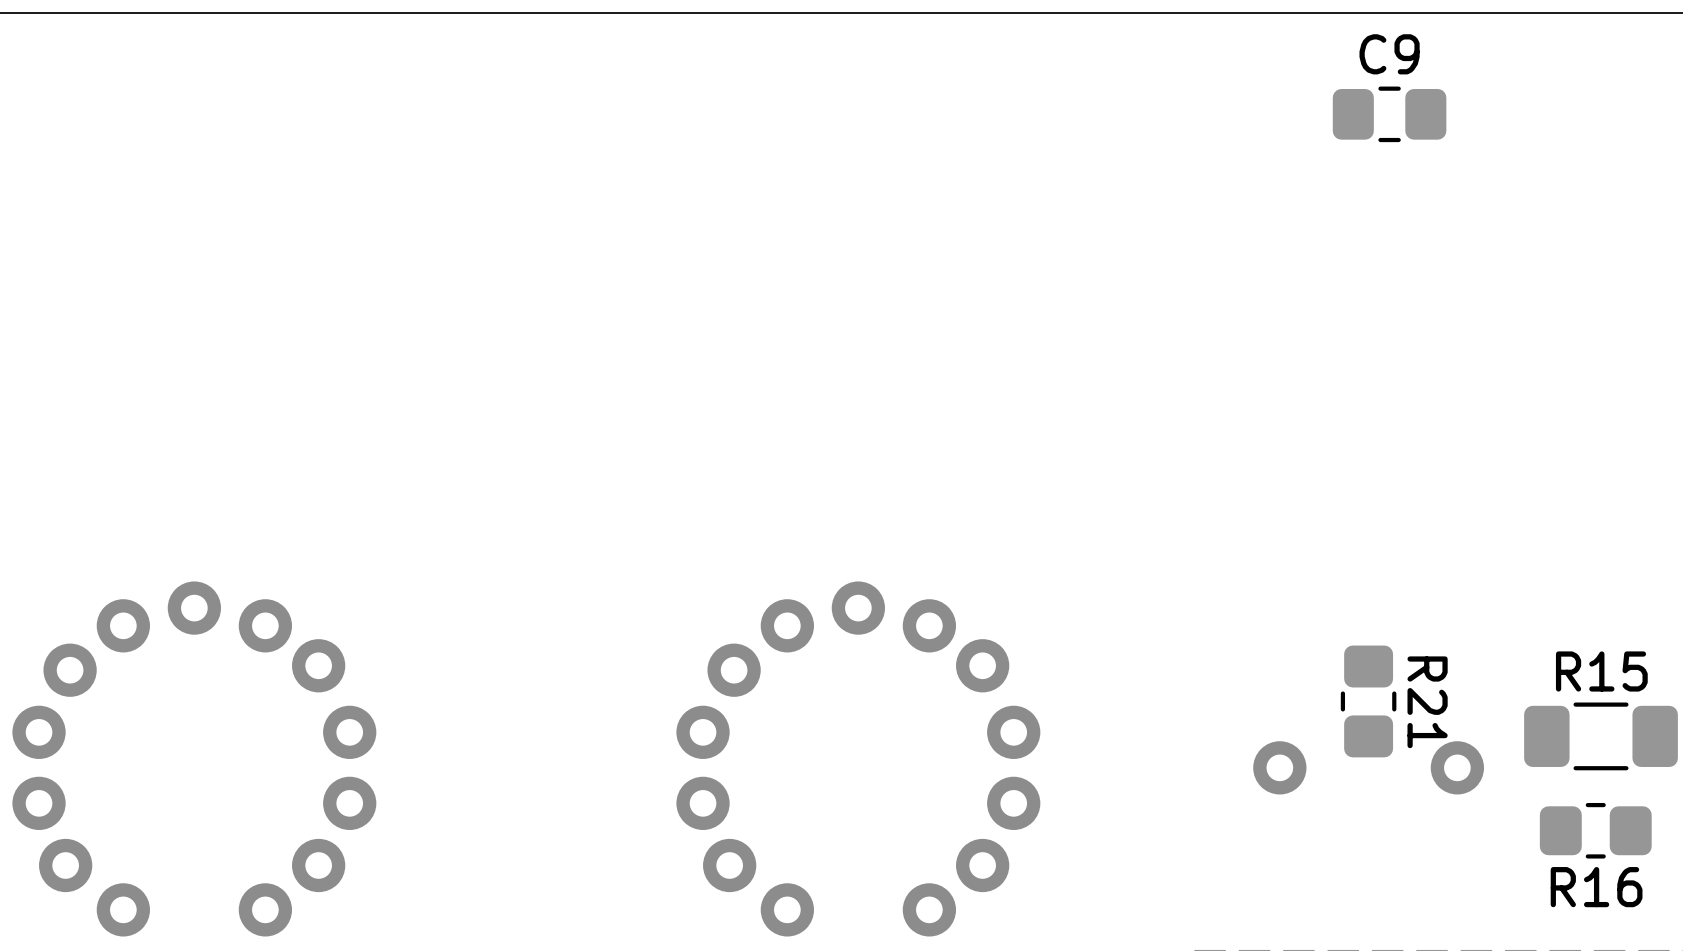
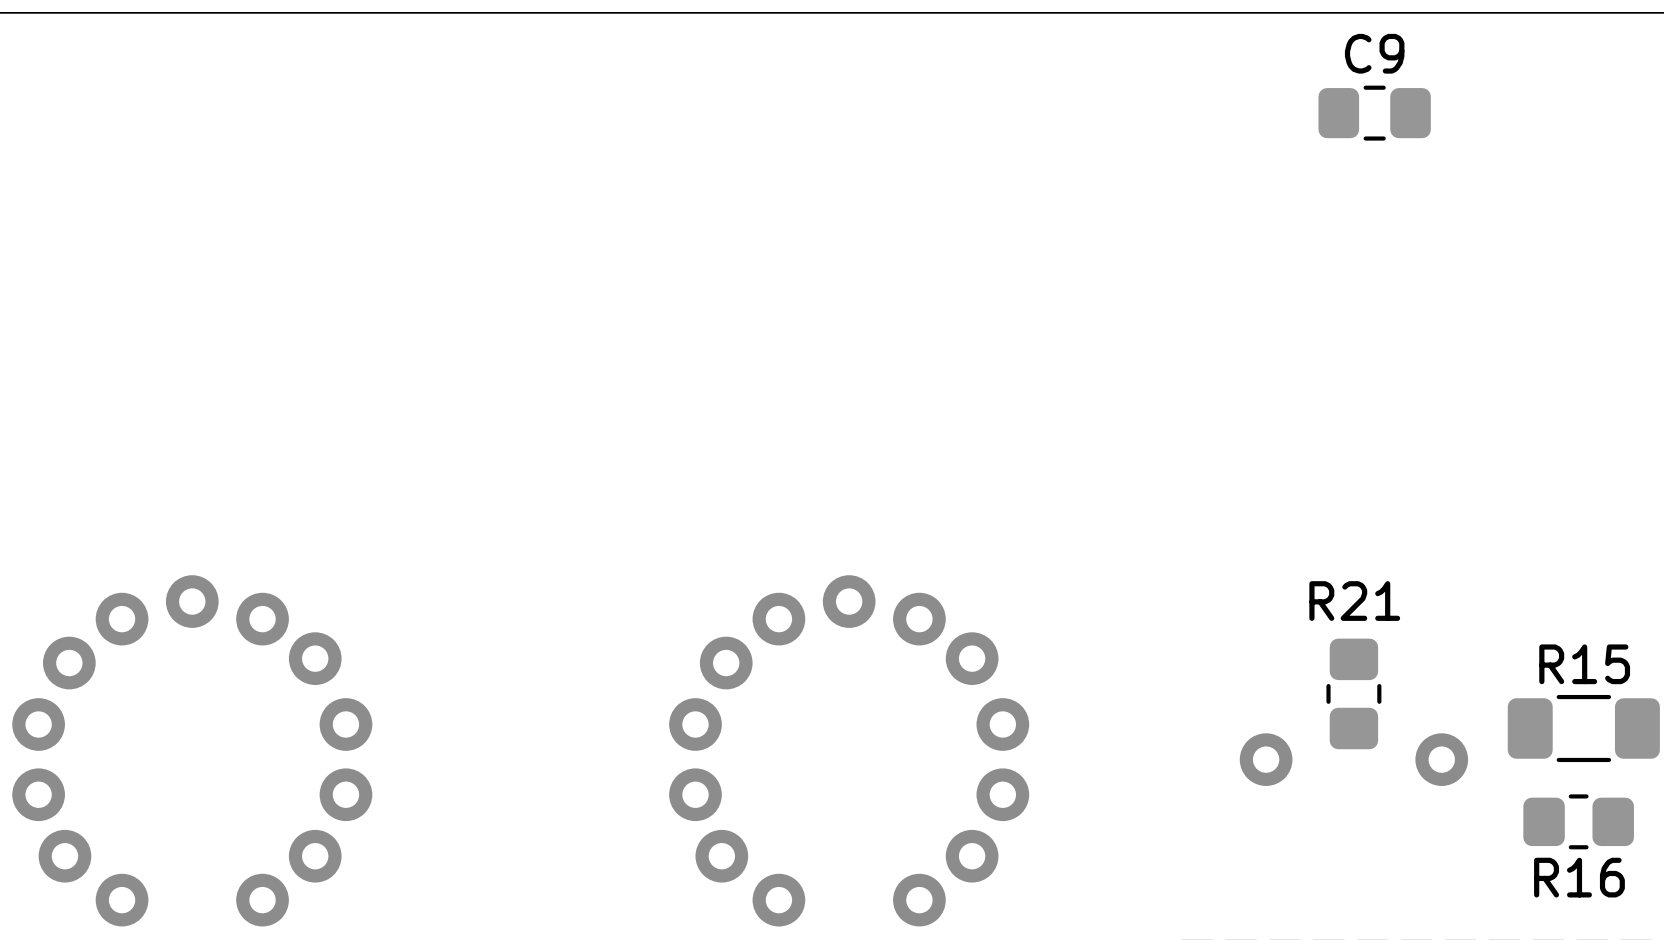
R21 name rotation: 0° (1427, 702) -> 90° counterclockwise (1354, 601)

